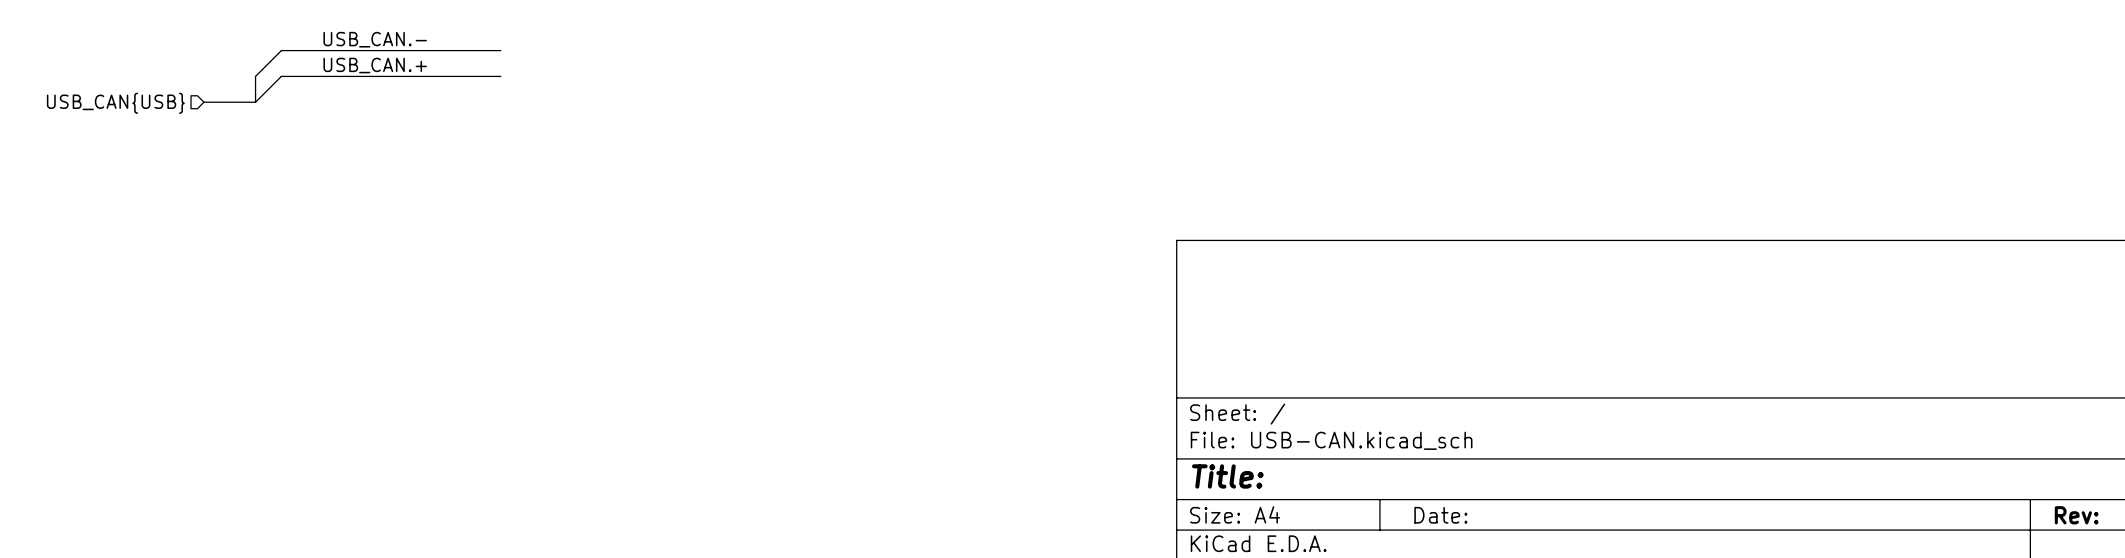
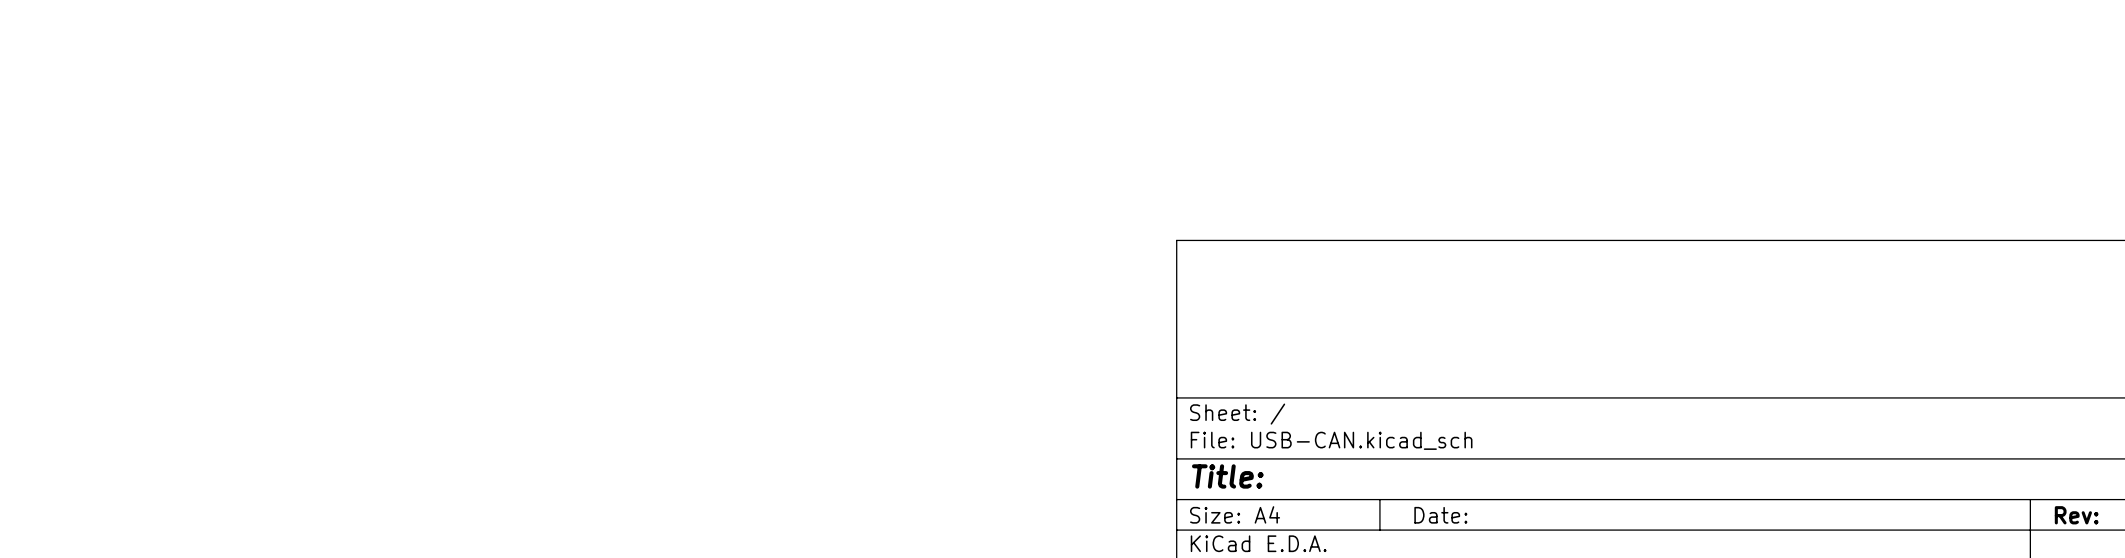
label: USB_CAN.- (375, 39) -> none
wire: (500, 50) (281, 50) (255, 76) -> none
label: USB_CAN.+ (375, 65) -> none
bus: (255, 76) (255, 102) (203, 102) -> none
wire: (500, 76) (281, 76) (255, 102) -> none
hierarchical label: USB_CAN{USB} (115, 103) -> none

